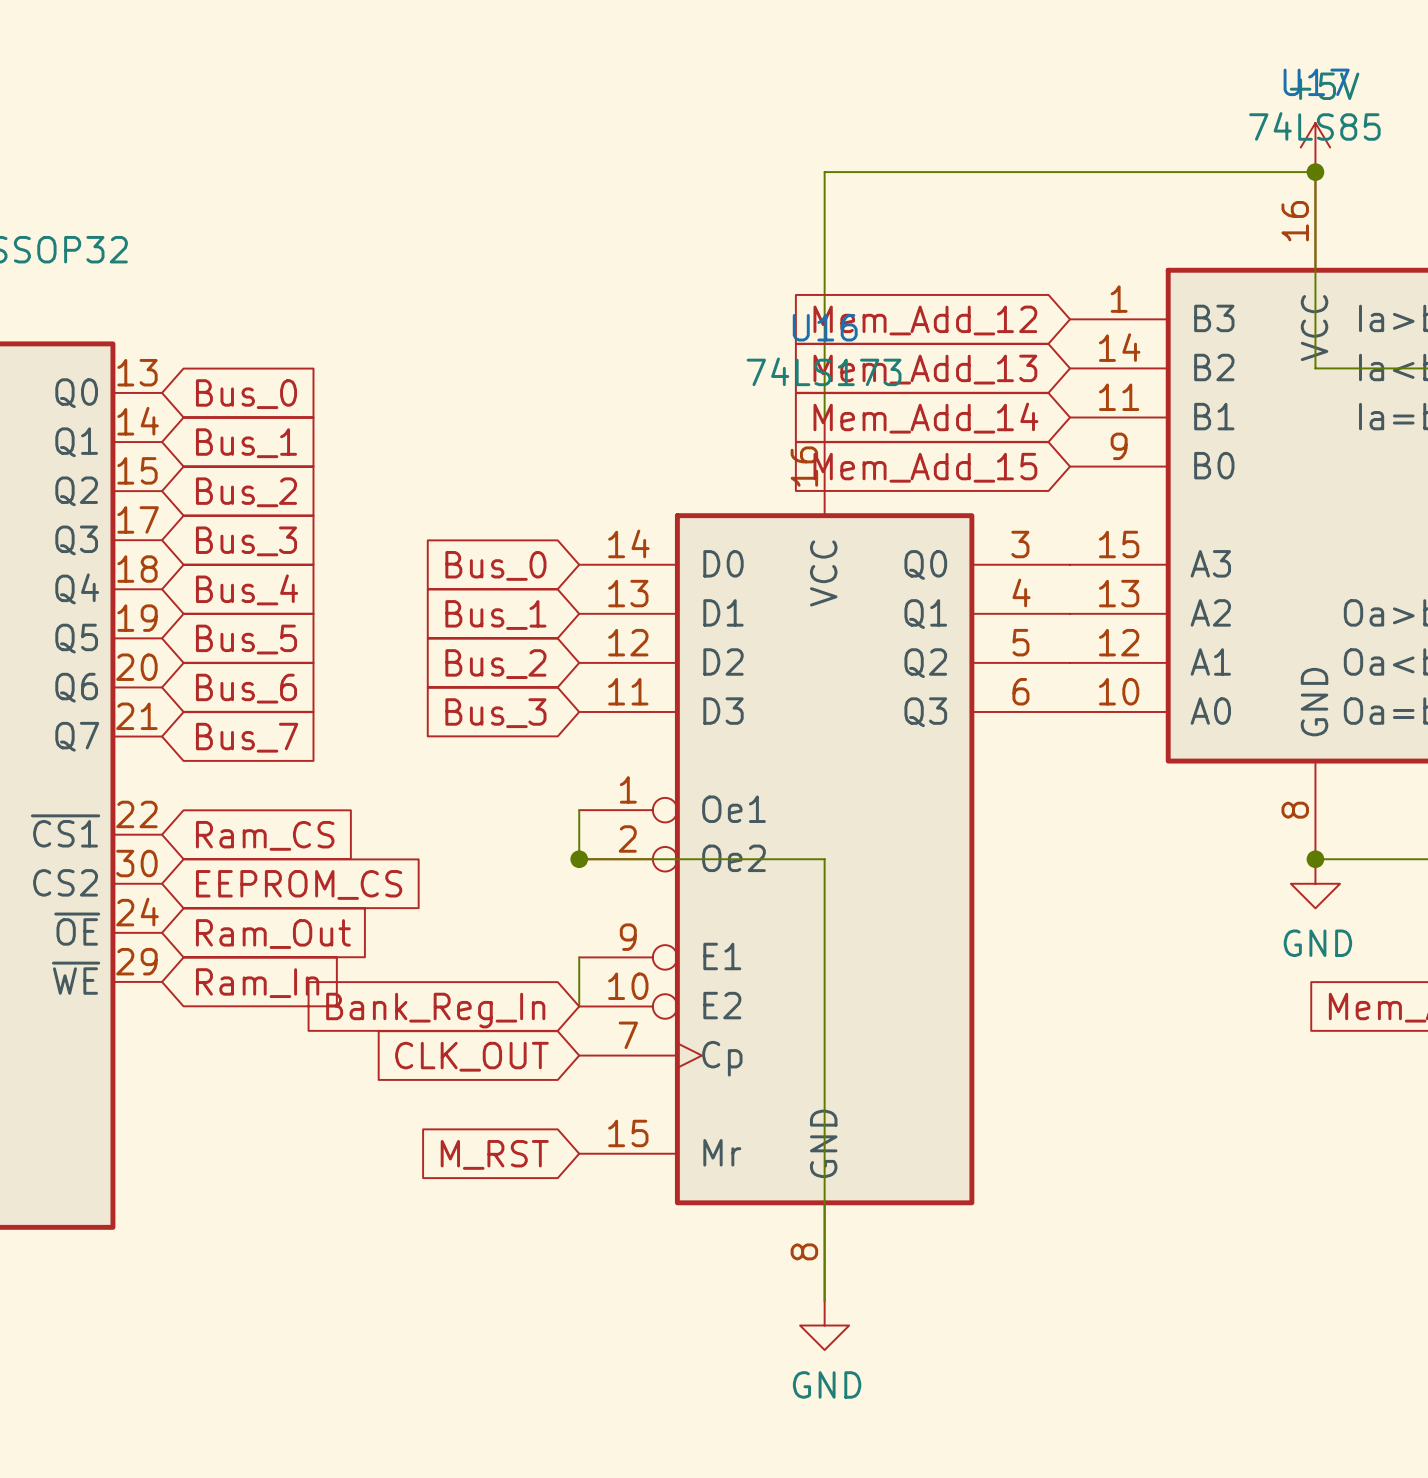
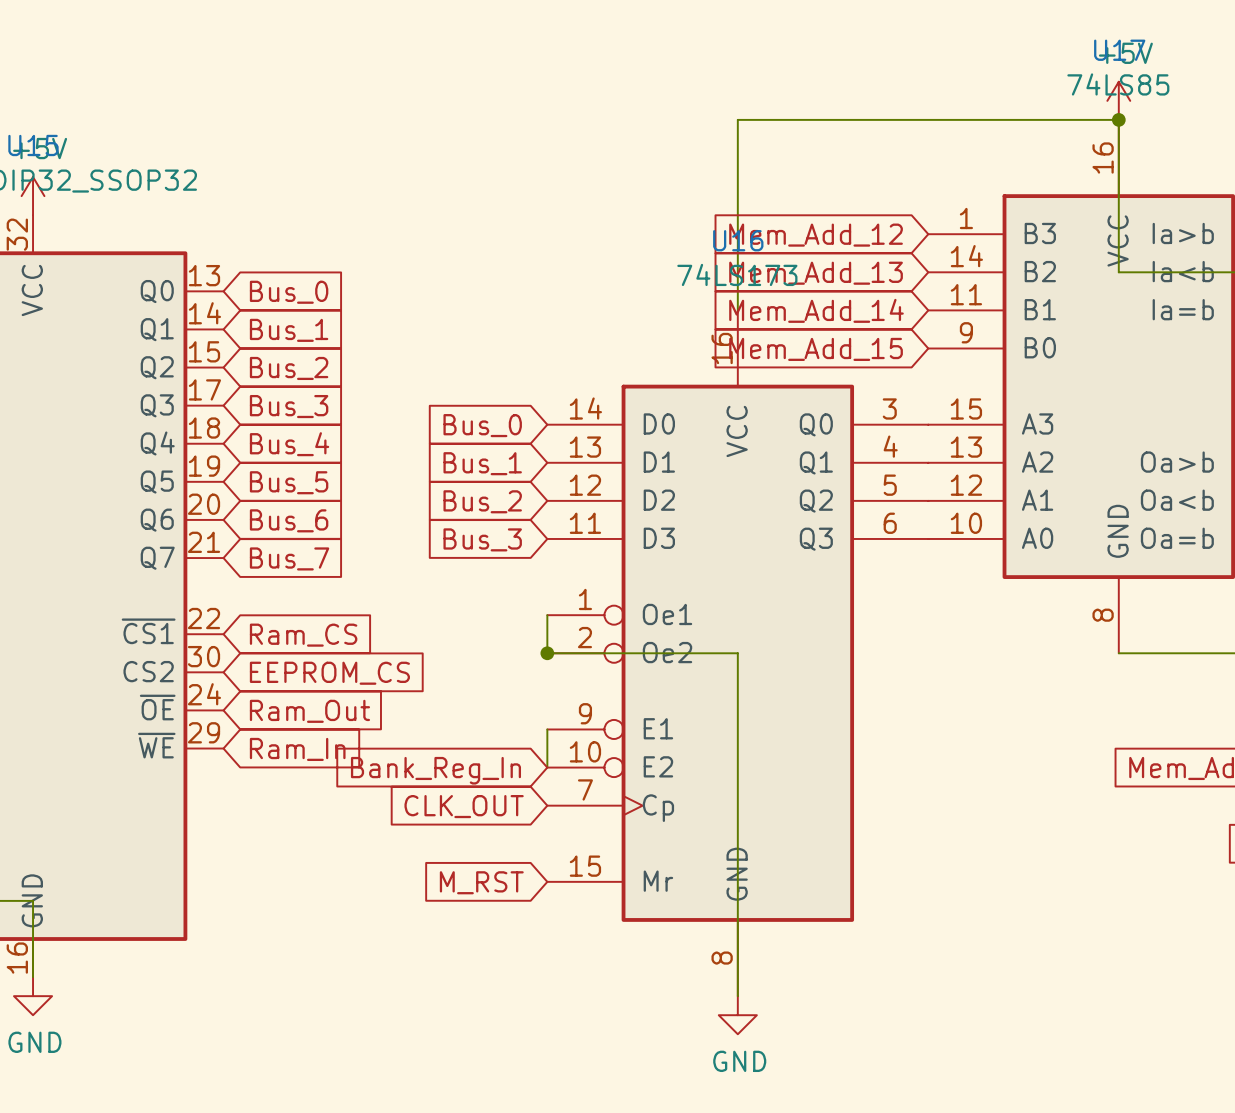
junction: (1315, 859) -> none
power symbol: GND (1315, 883) -> none

